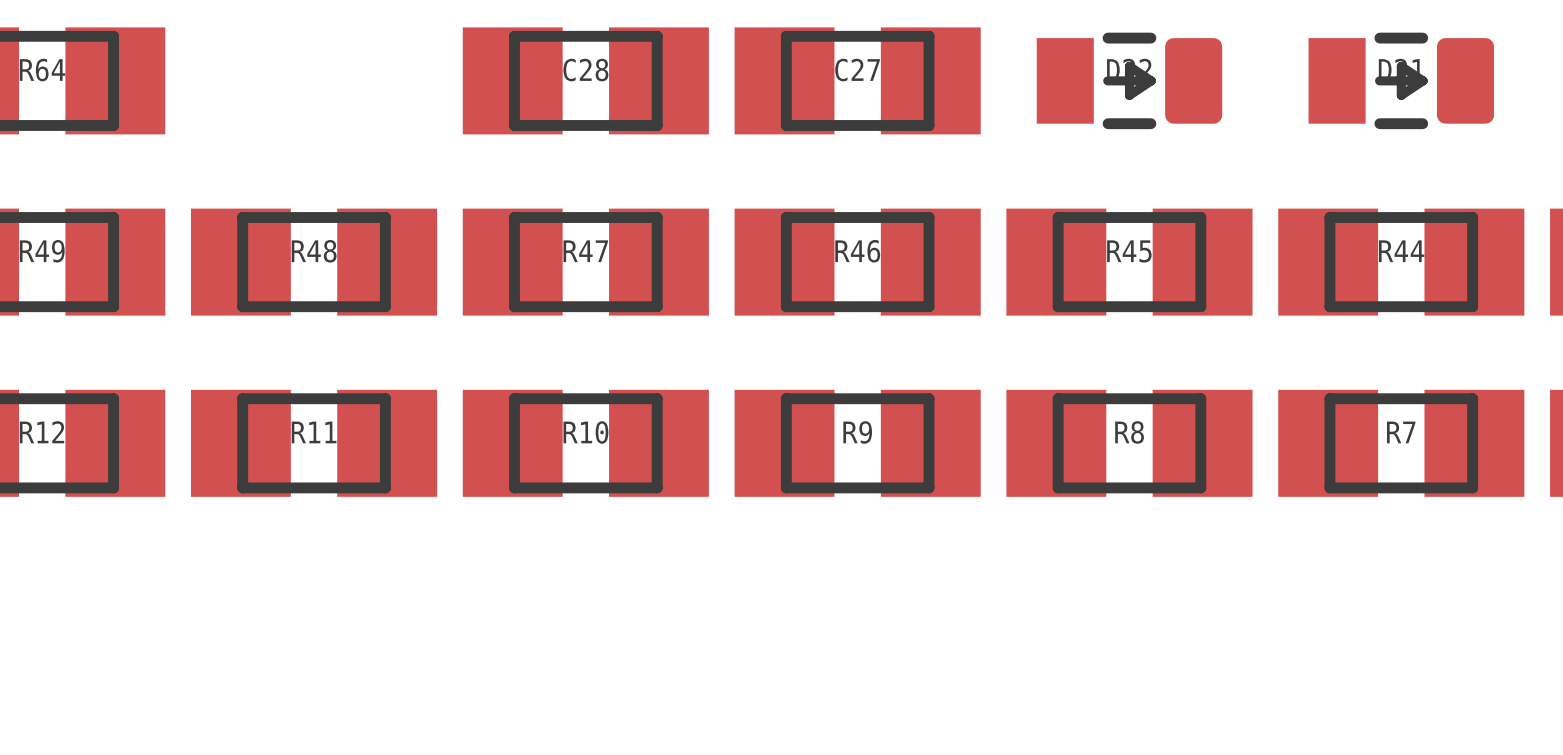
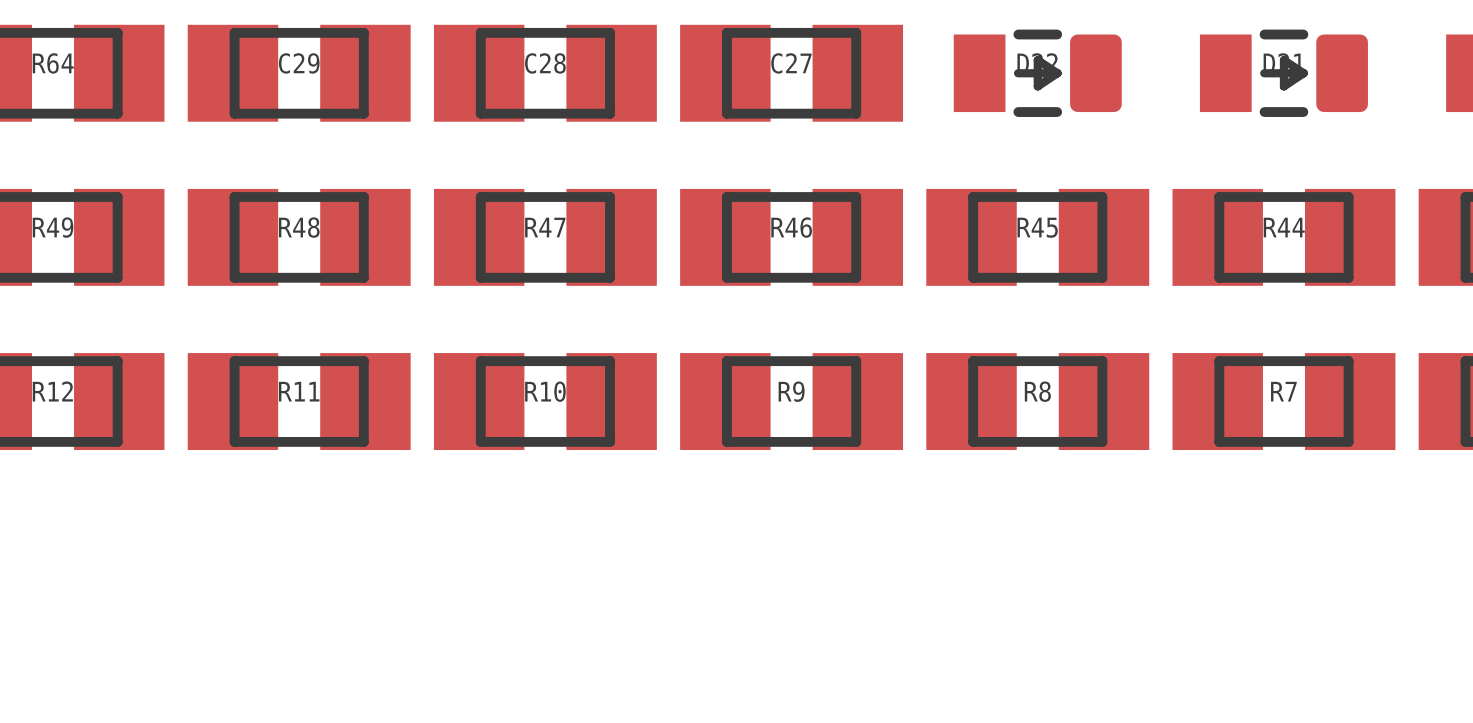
C29: none -> (299, 73)

